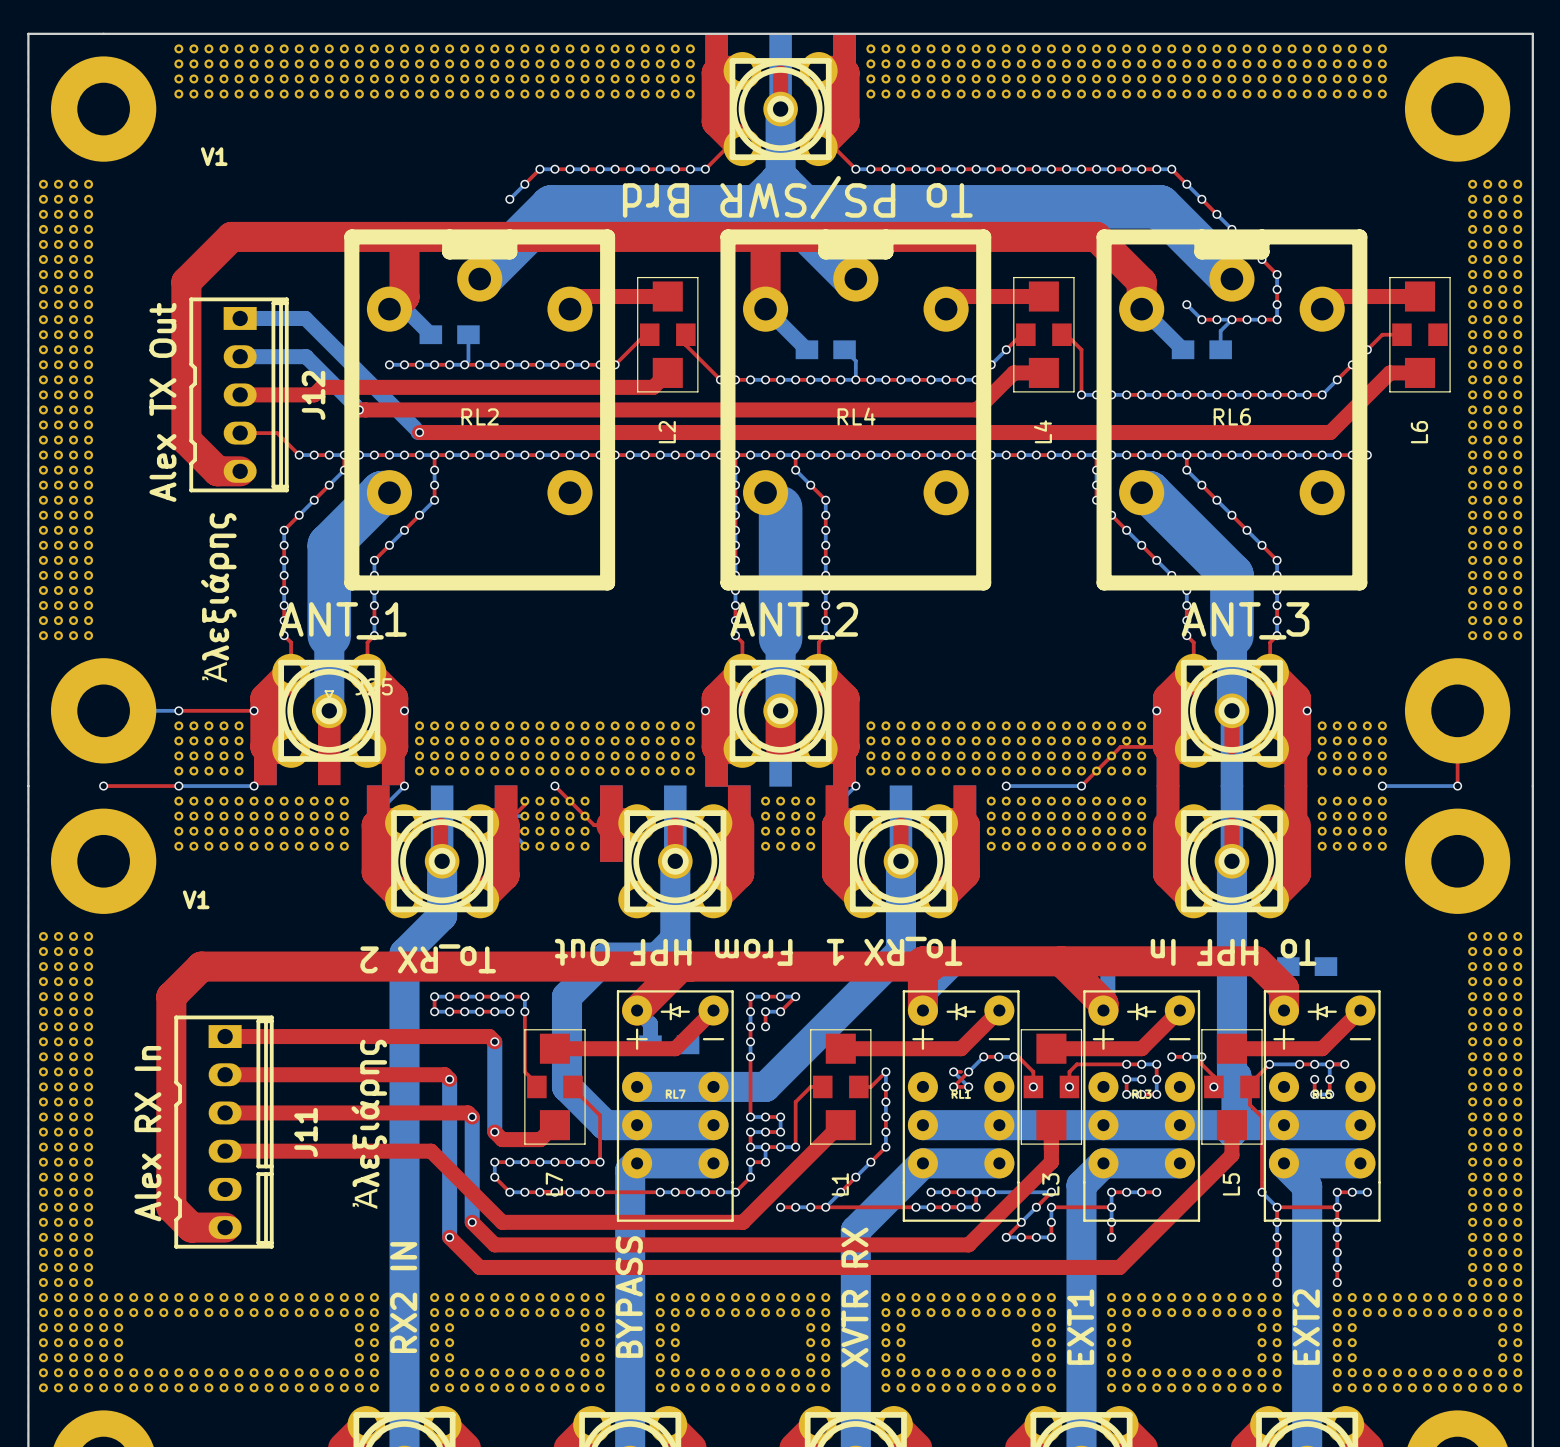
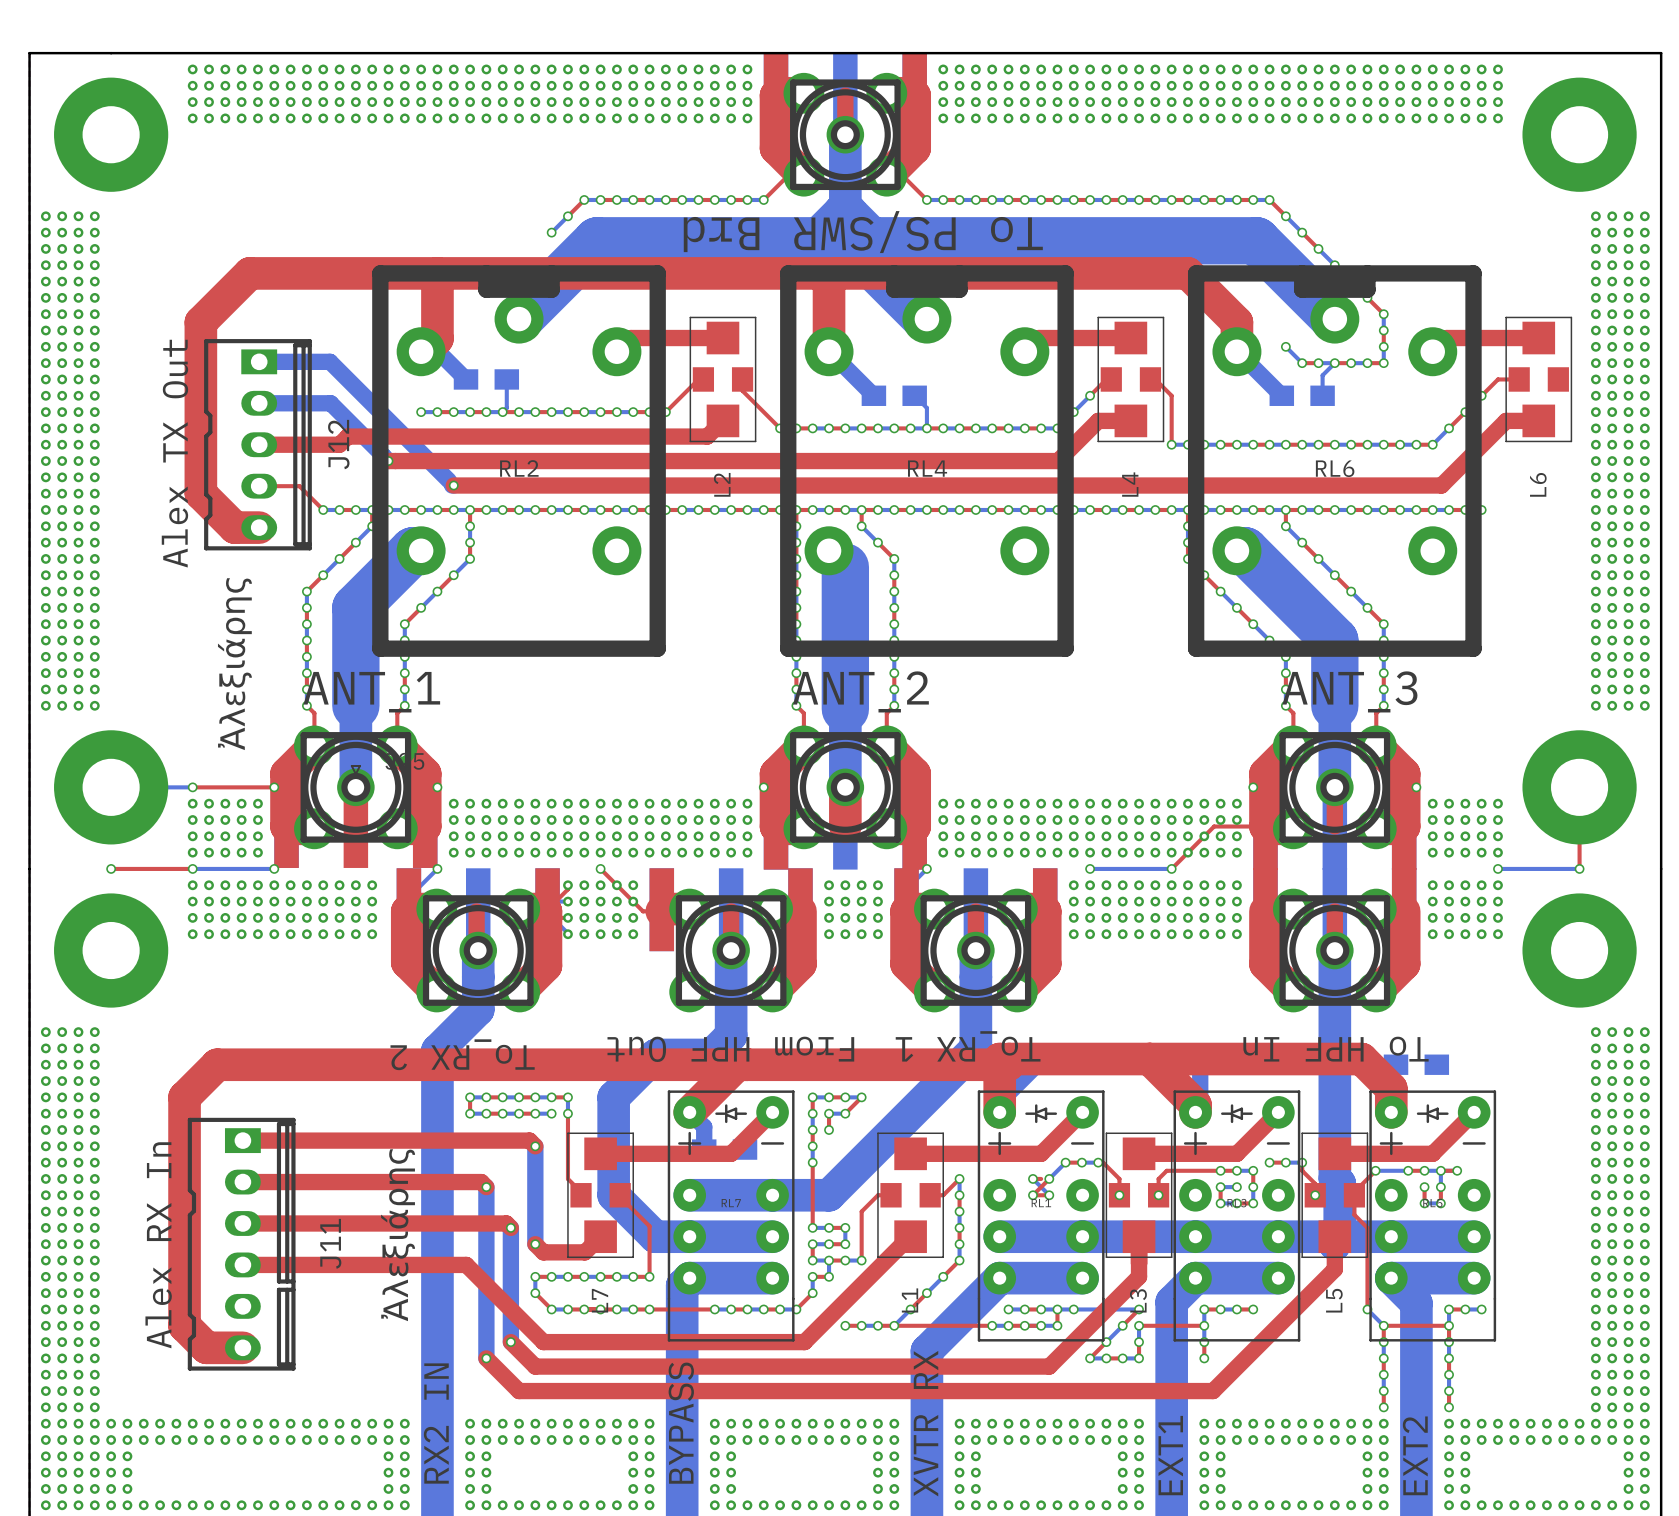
text: V1 (214, 156) -> none
text: V1 (196, 899) -> none

